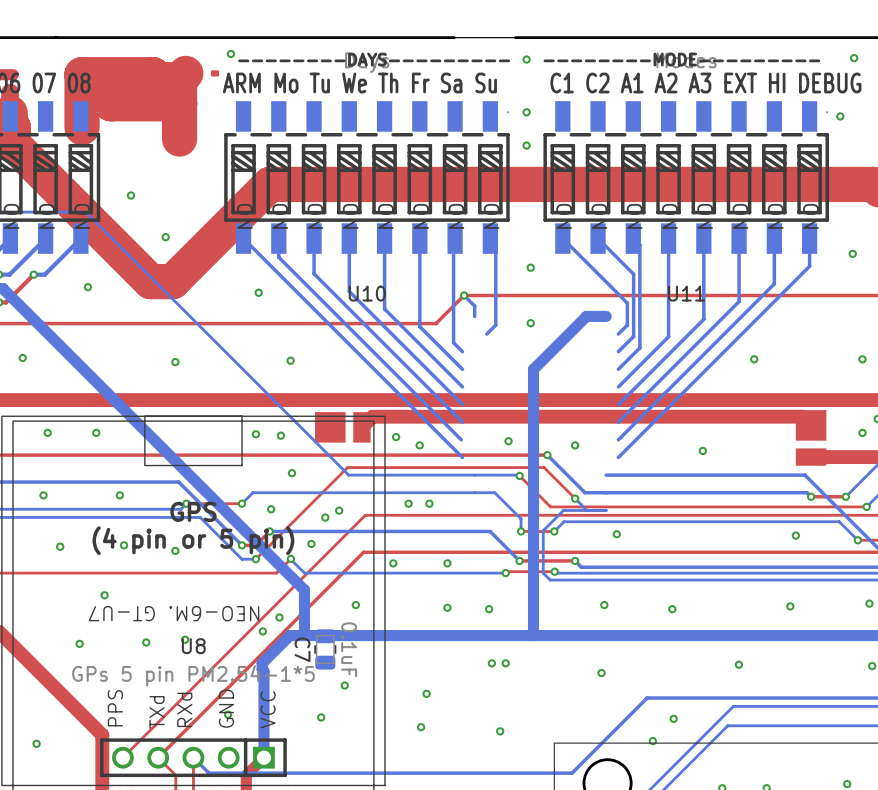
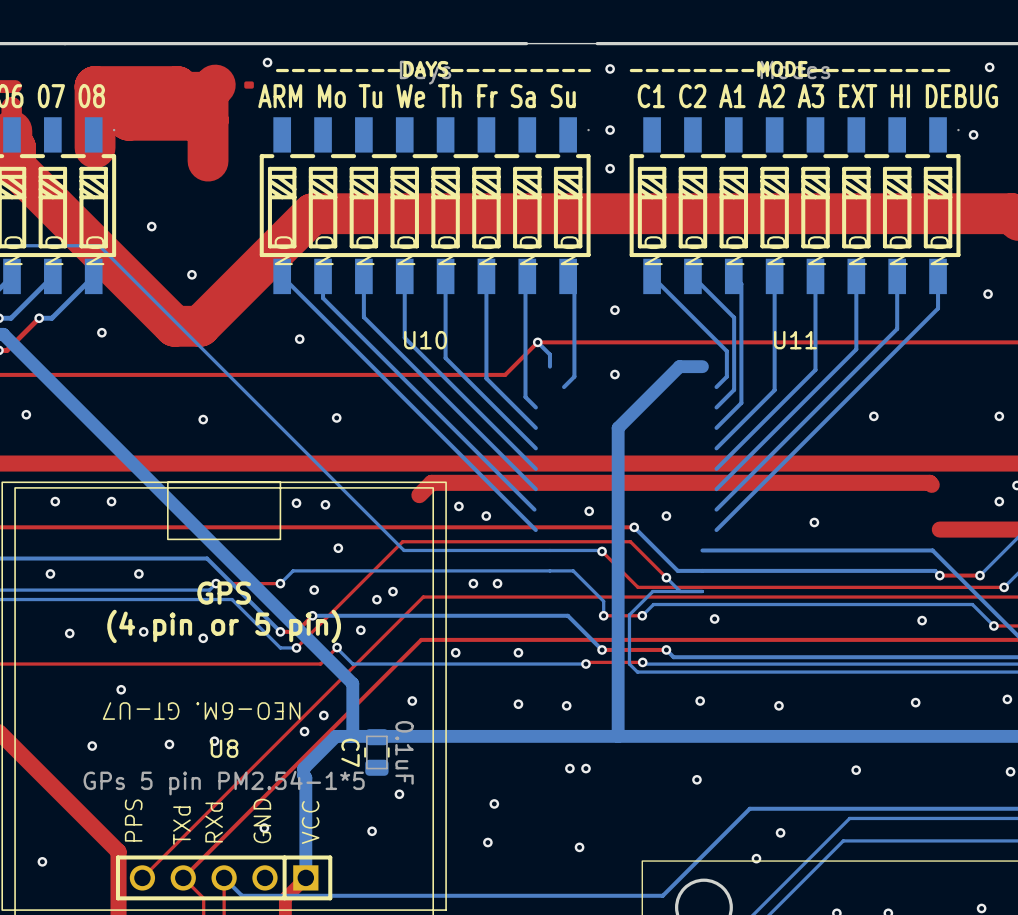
part: (342, 427) -> none
part: (811, 437) -> none

